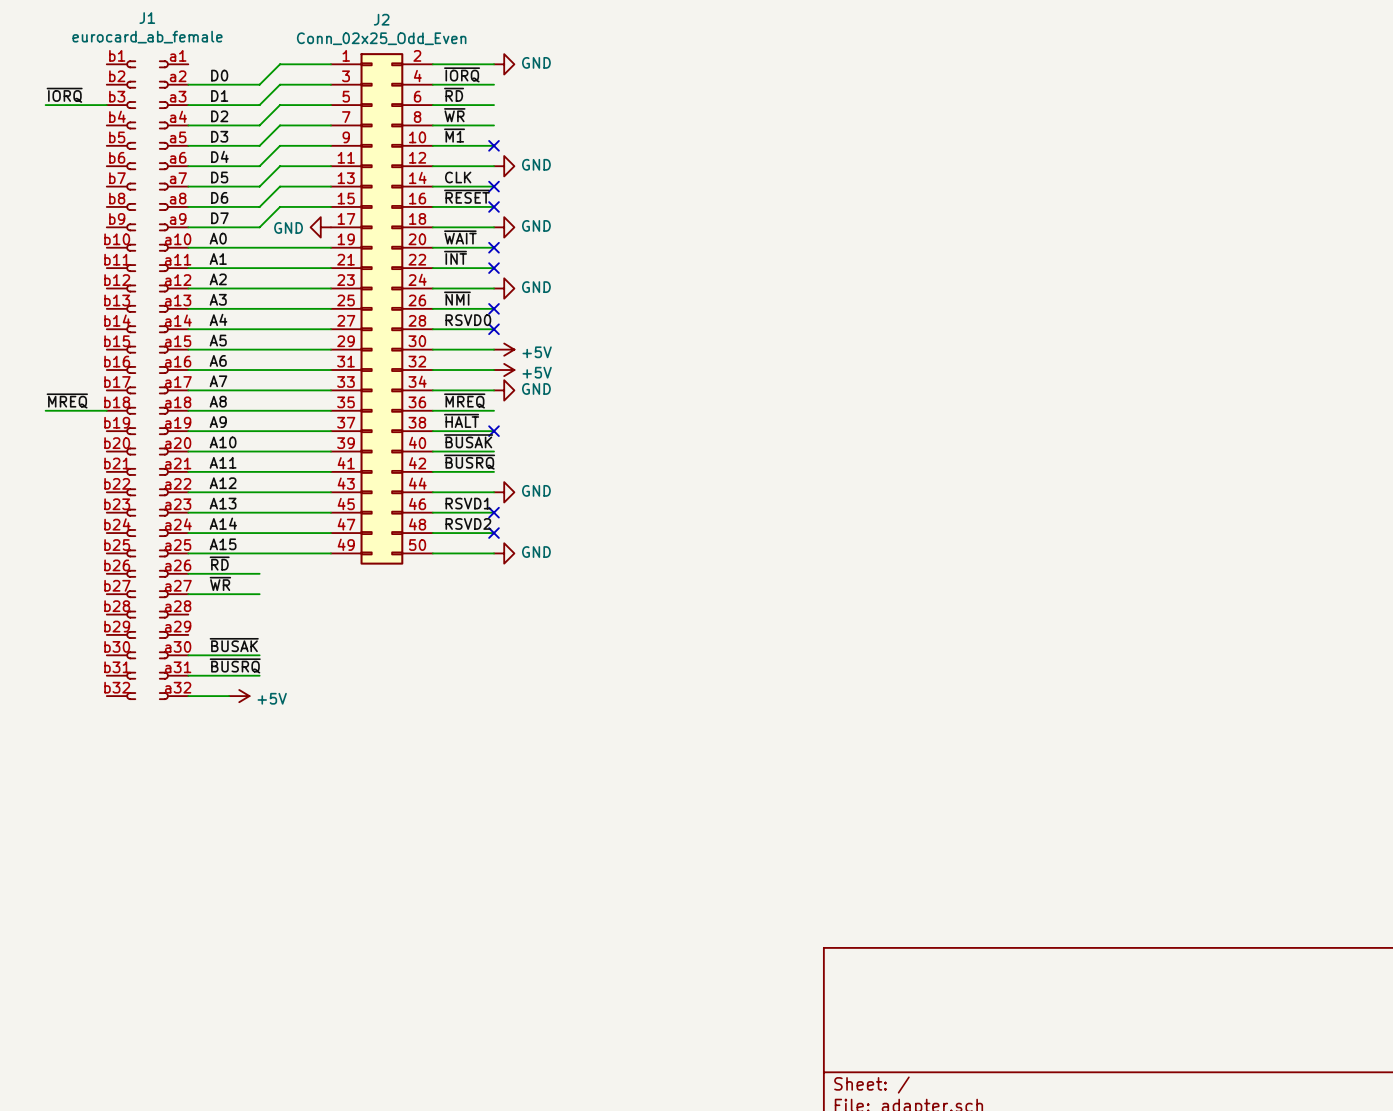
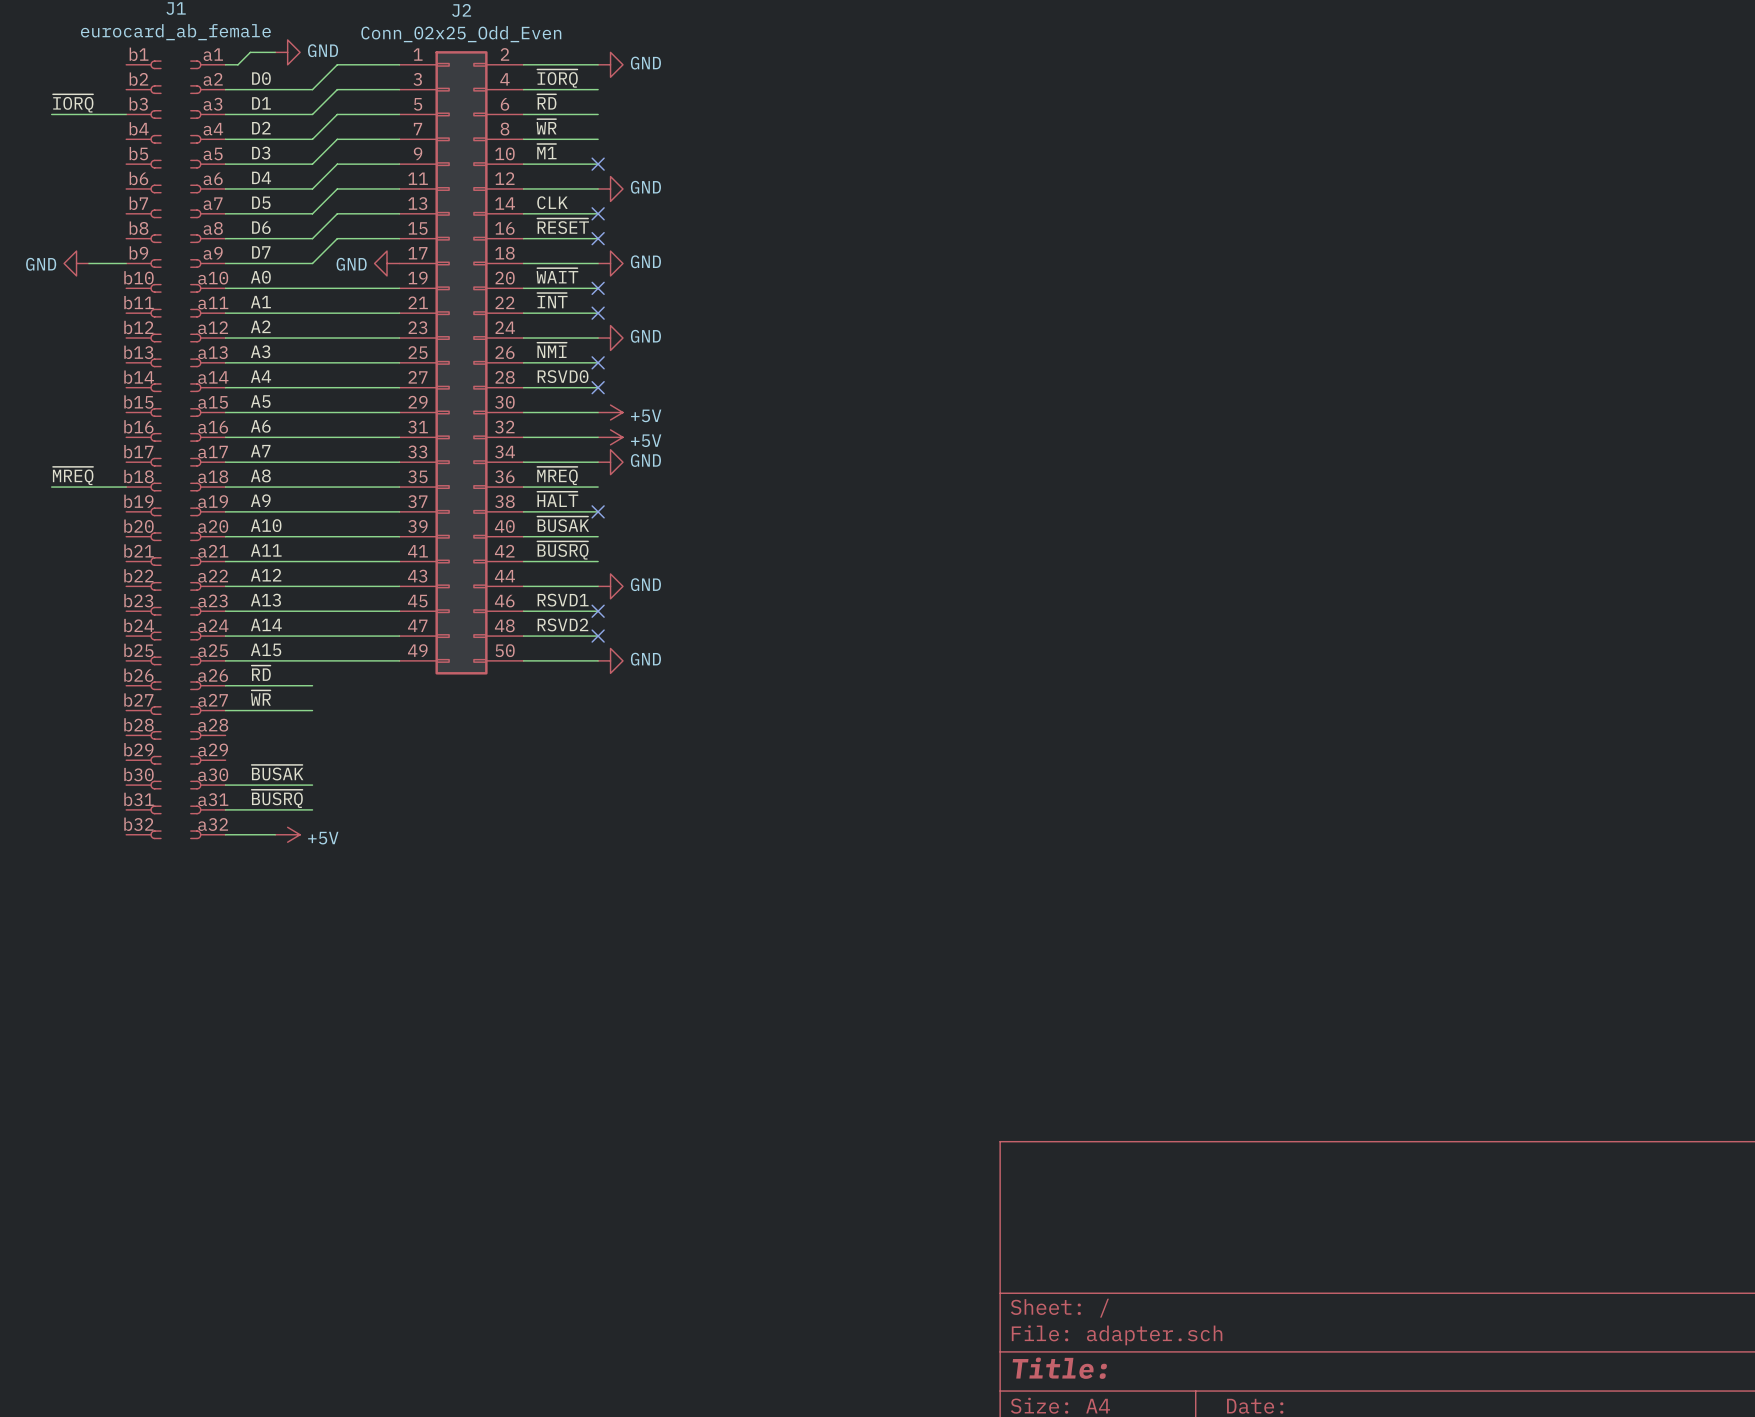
wire: none -> (275, 52) (250, 52) (237, 64) (225, 64)
power symbol: none -> GND (287, 52)
power symbol: none -> GND (76, 263)
wire: none -> (88, 263) (126, 263)

